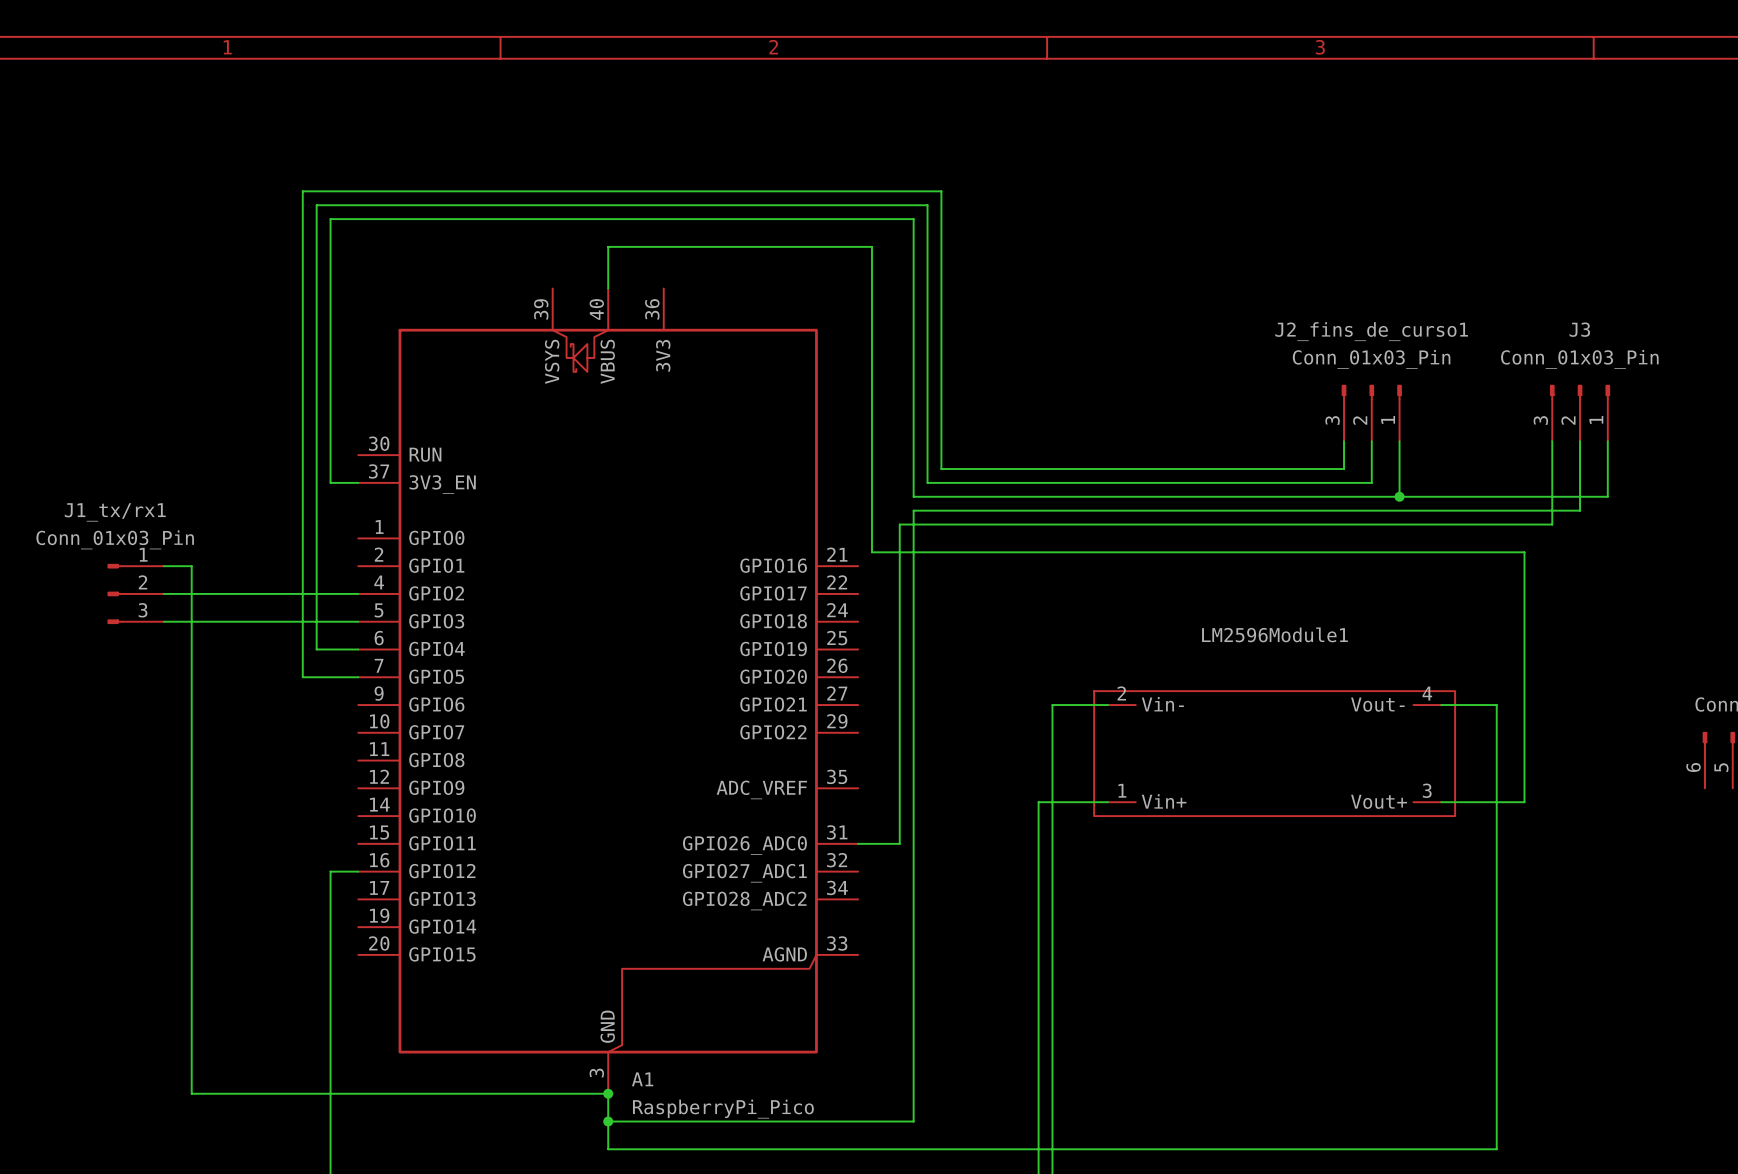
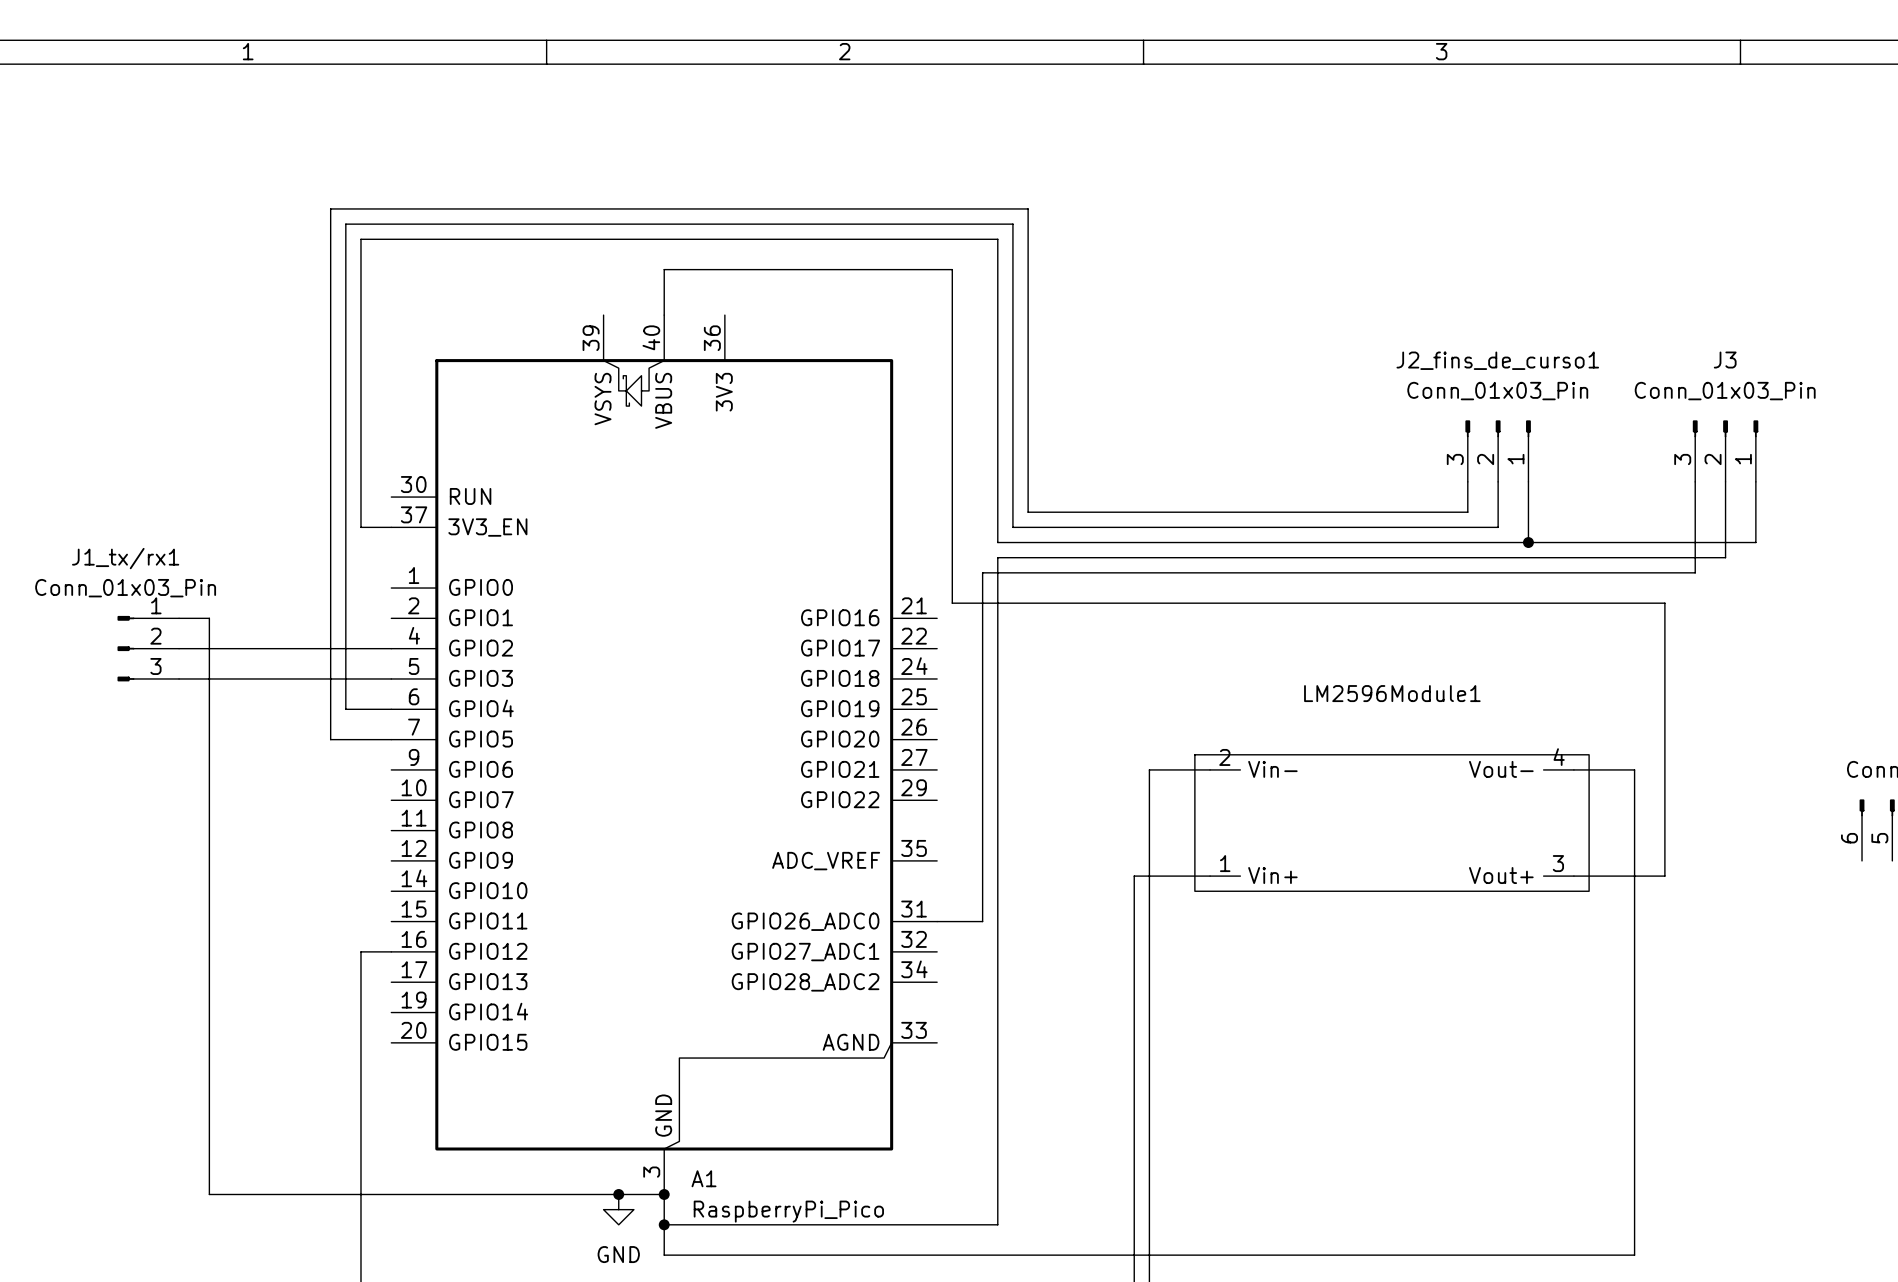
junction: none -> (618, 1194)
power symbol: none -> GND (618, 1209)

